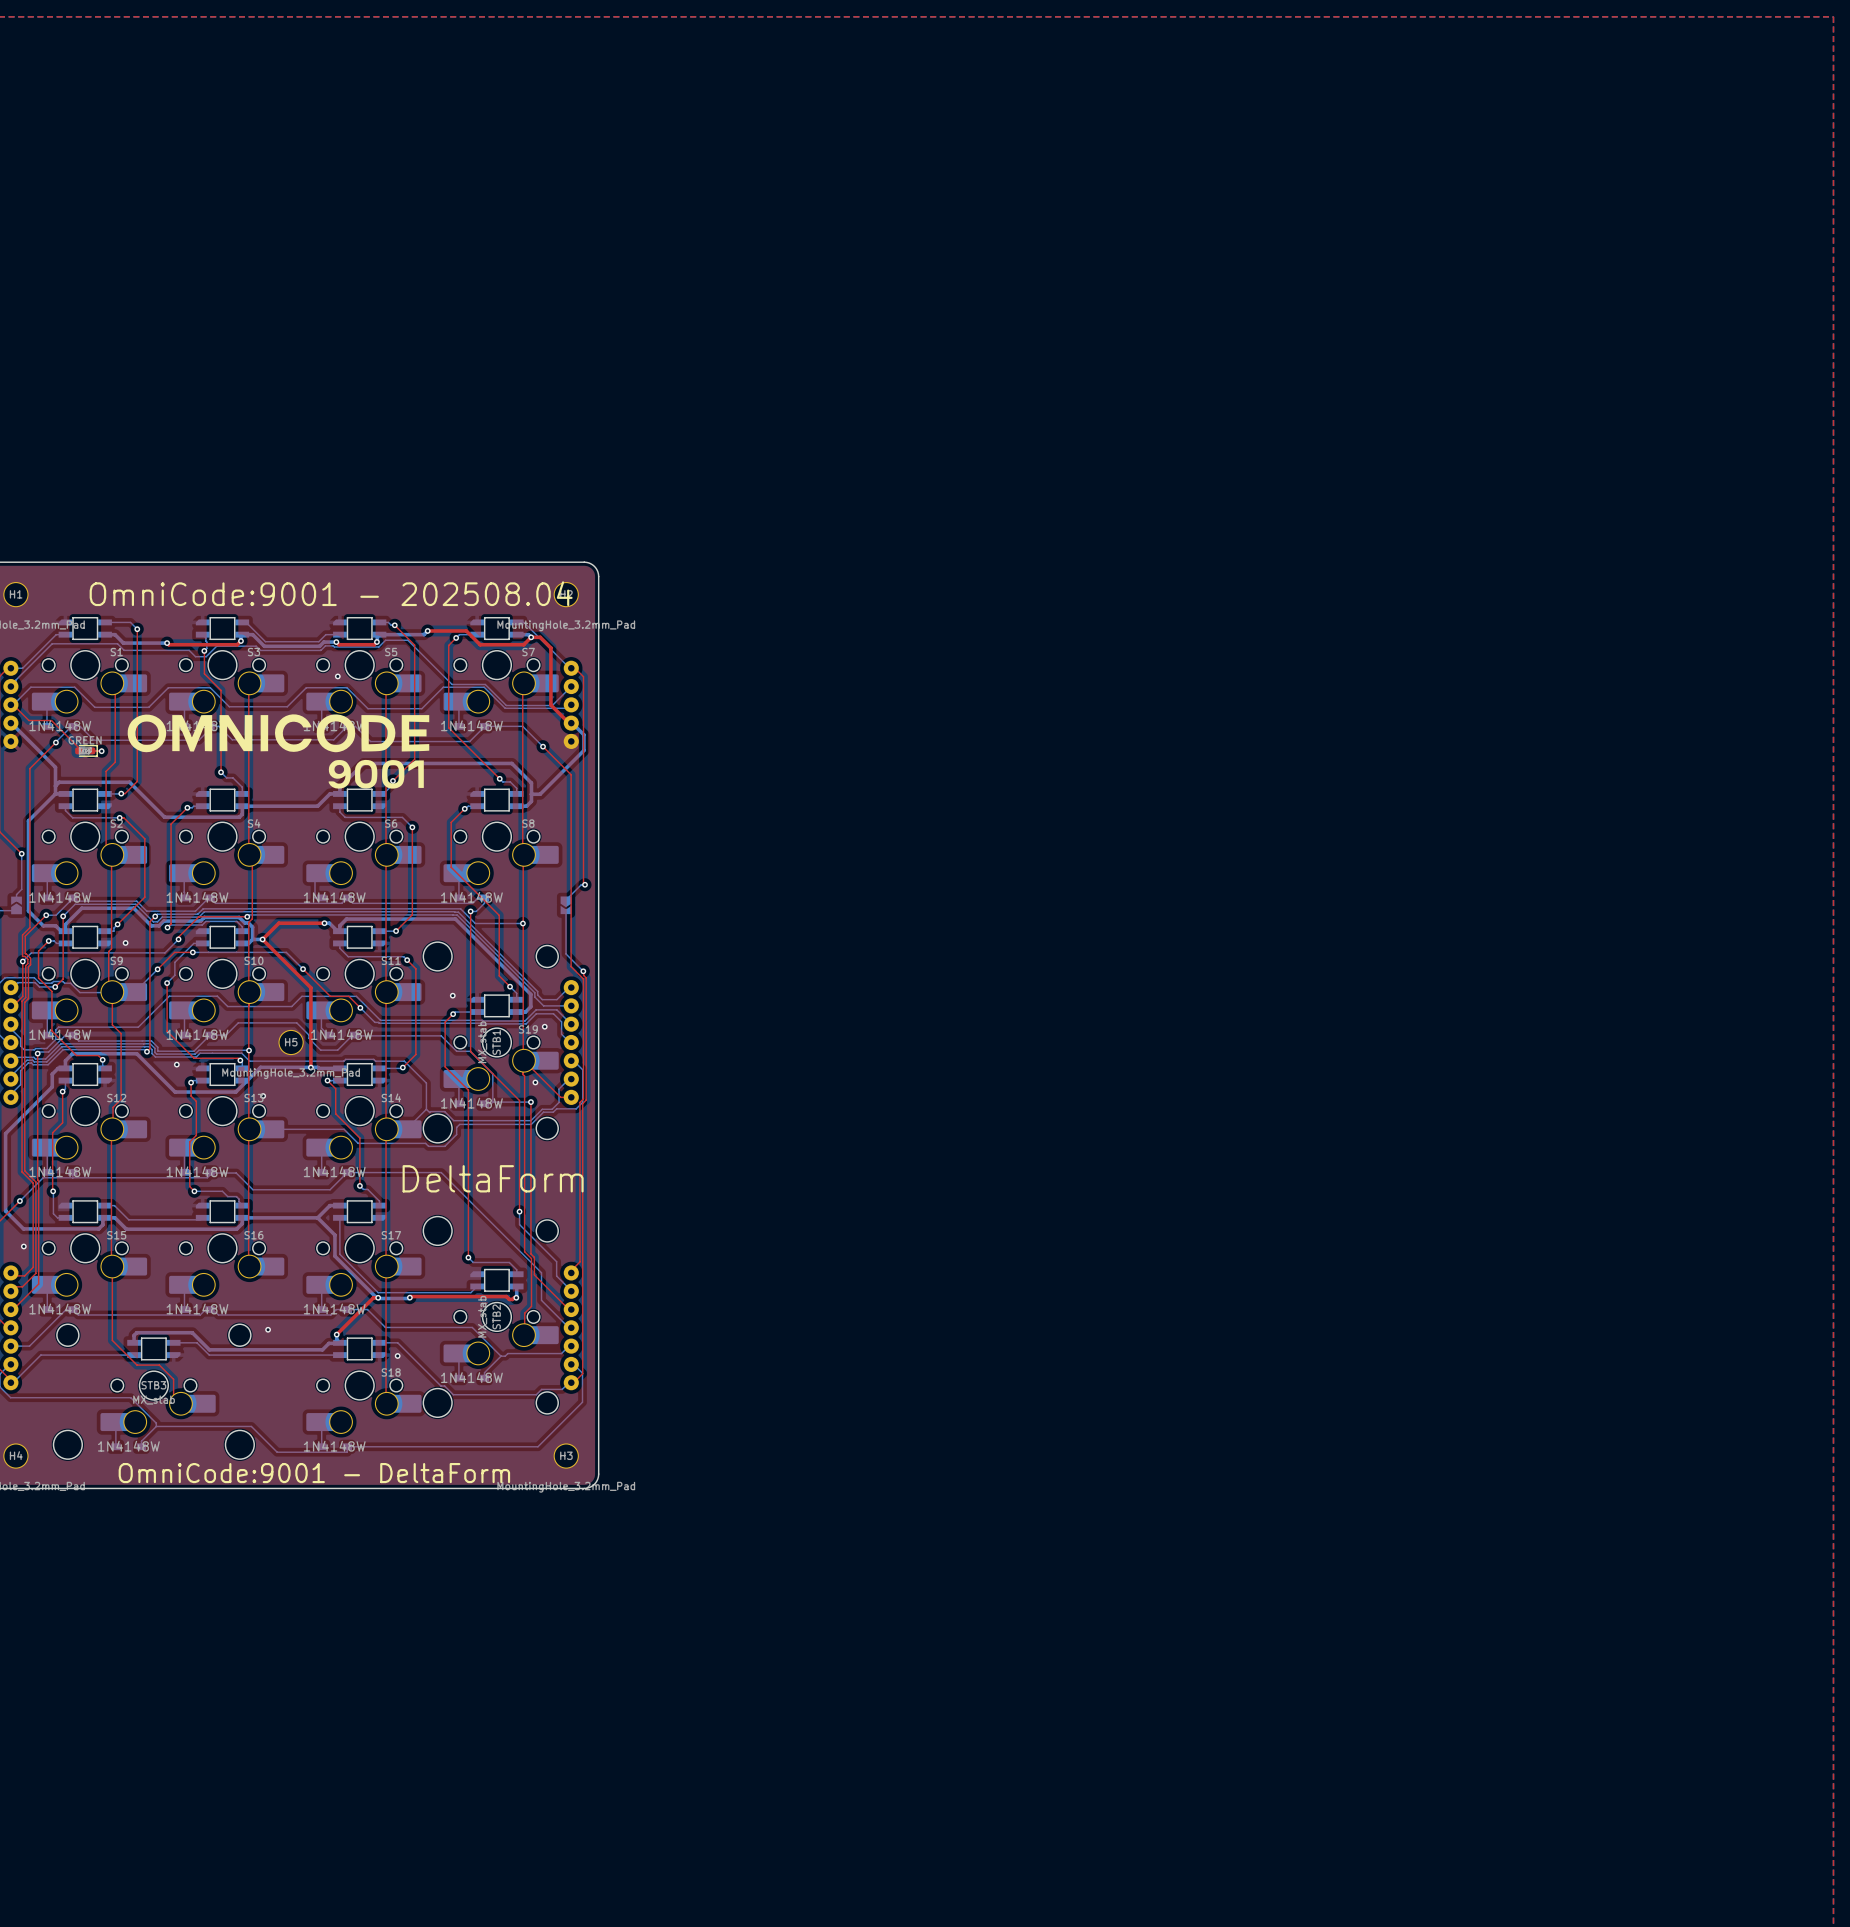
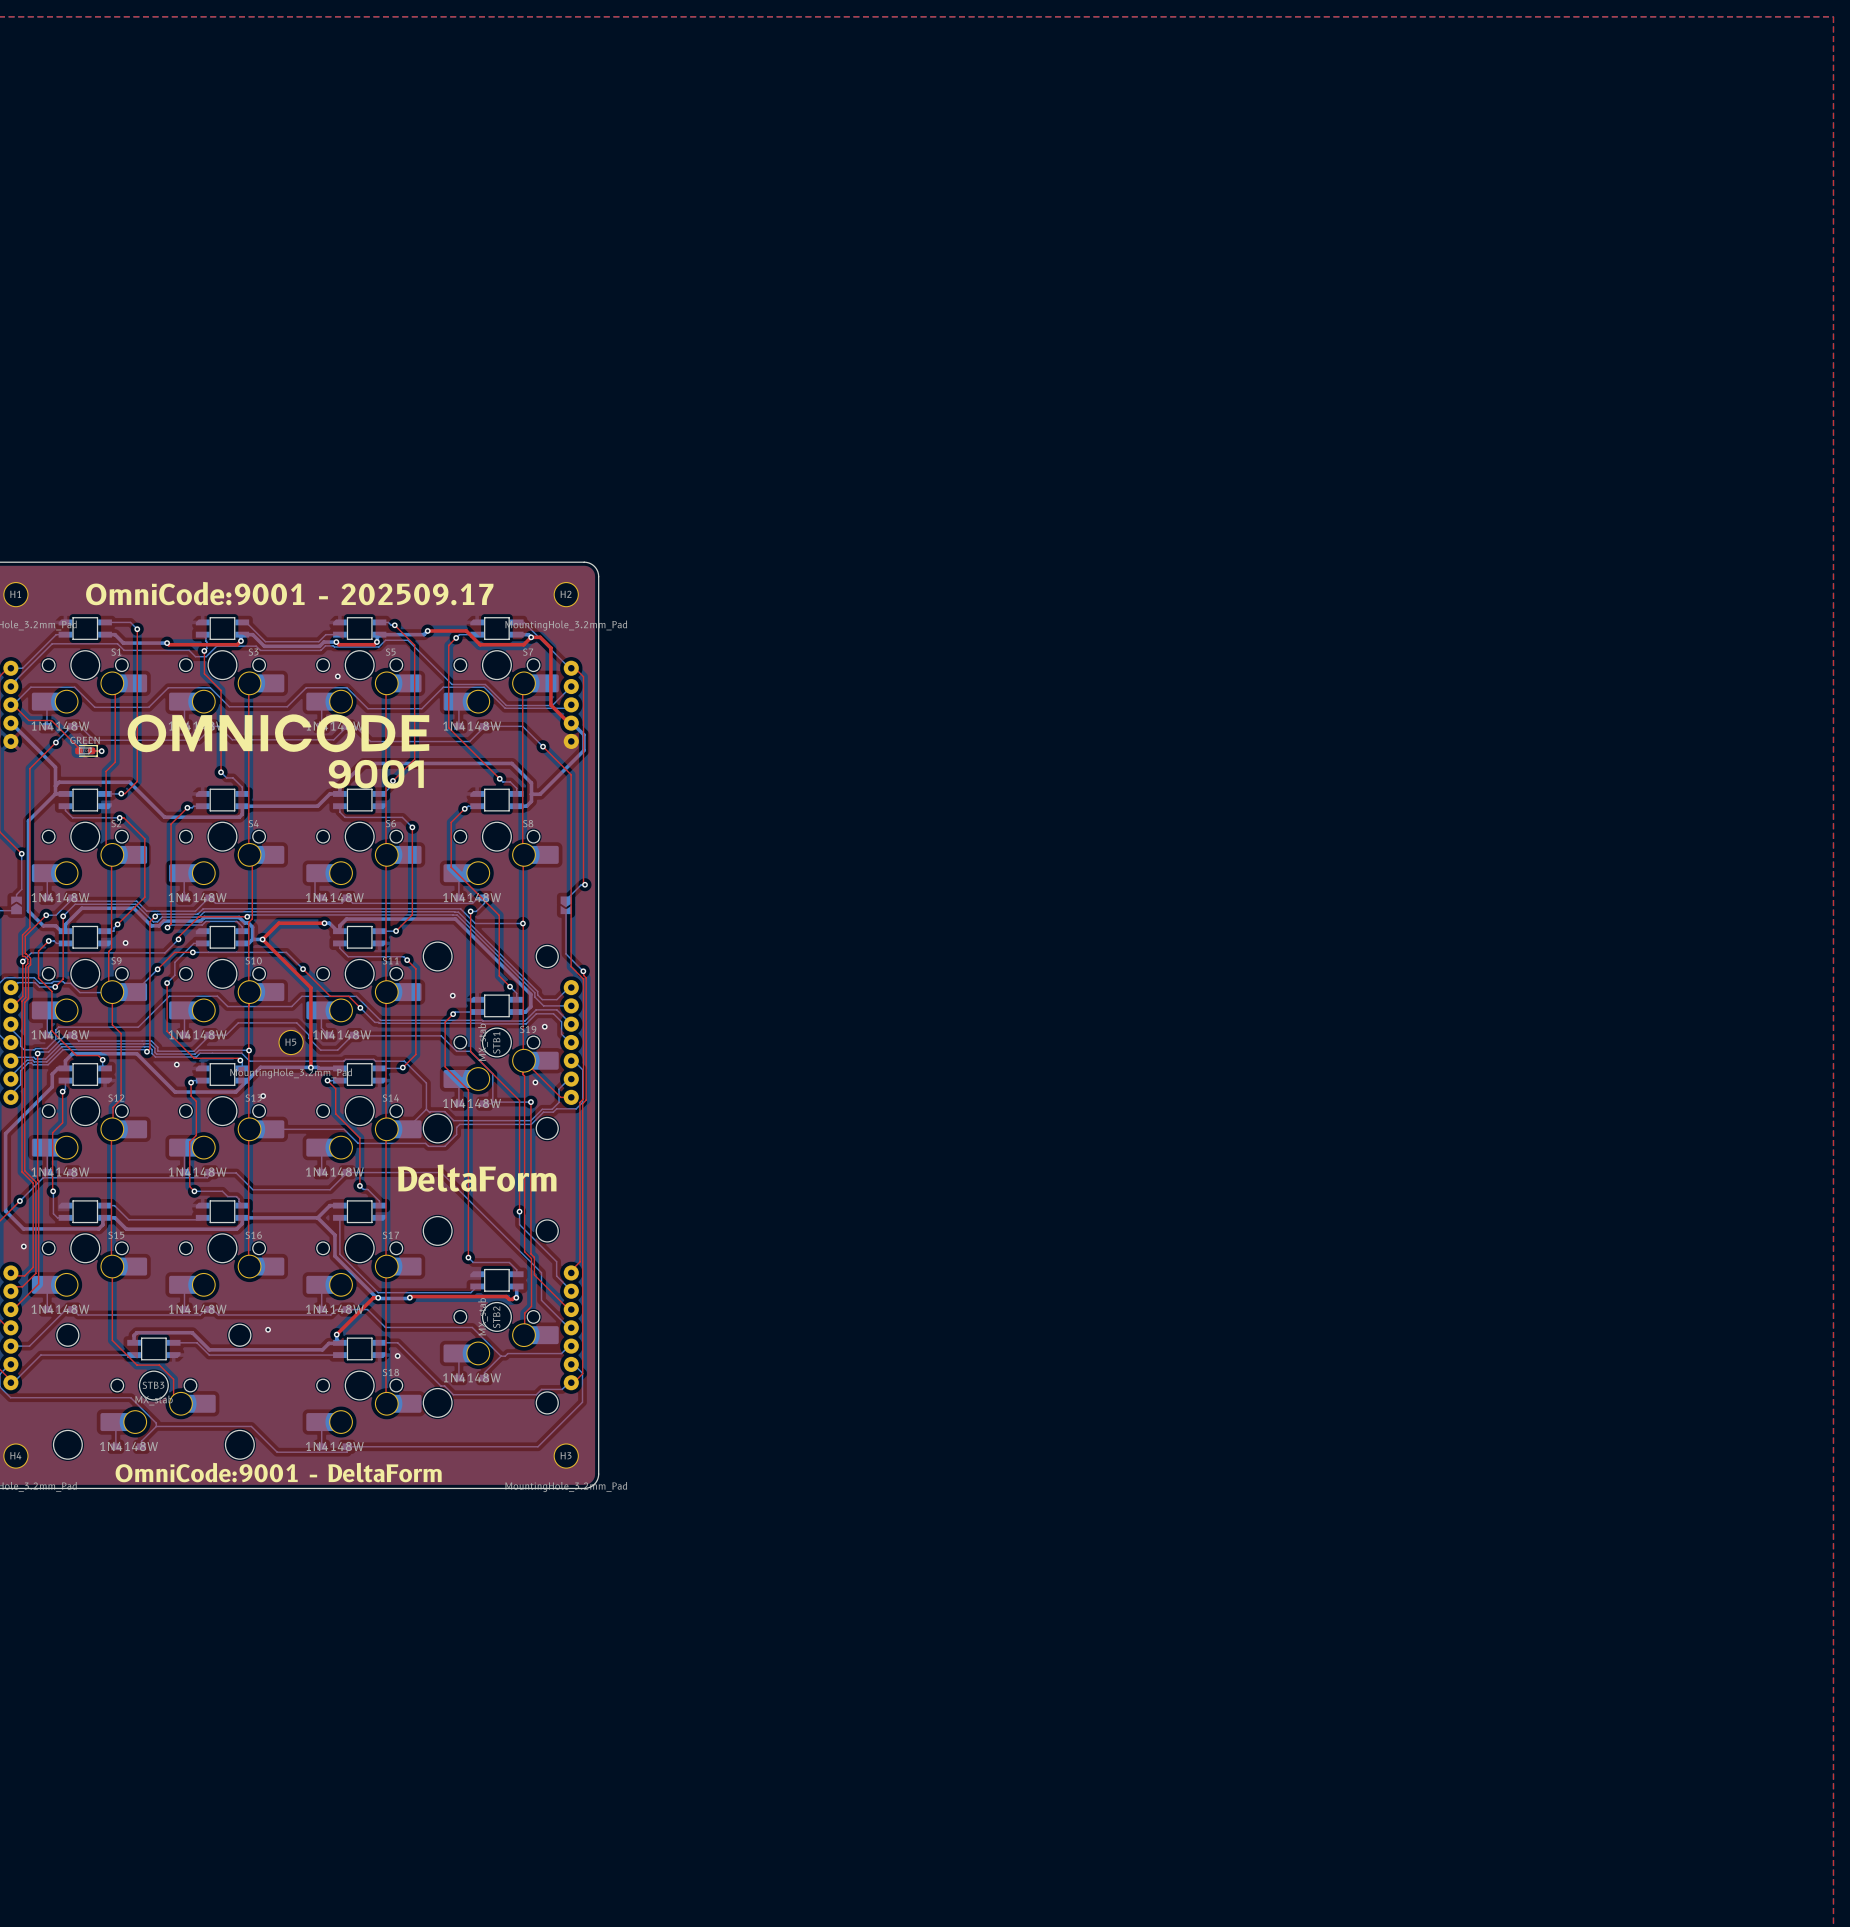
text: OmniCode:9001 - 202508.04 (331, 593) -> OmniCode:9001 - 202509.17 (289, 593)

